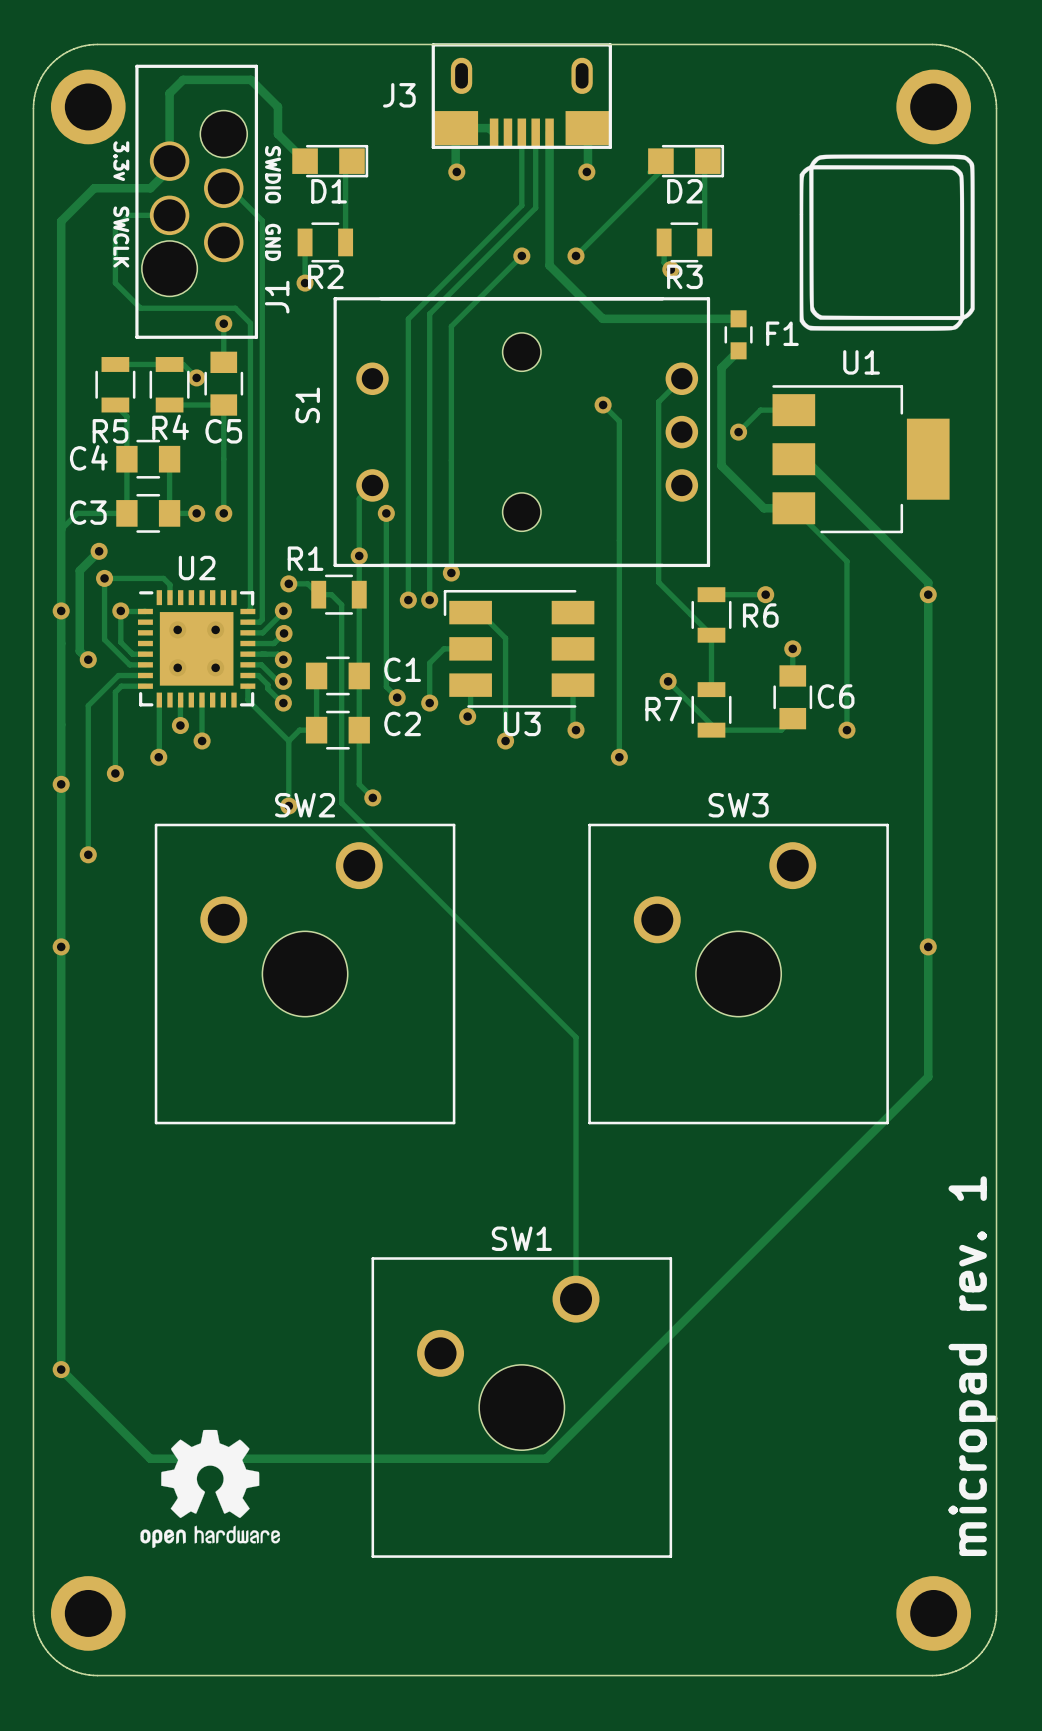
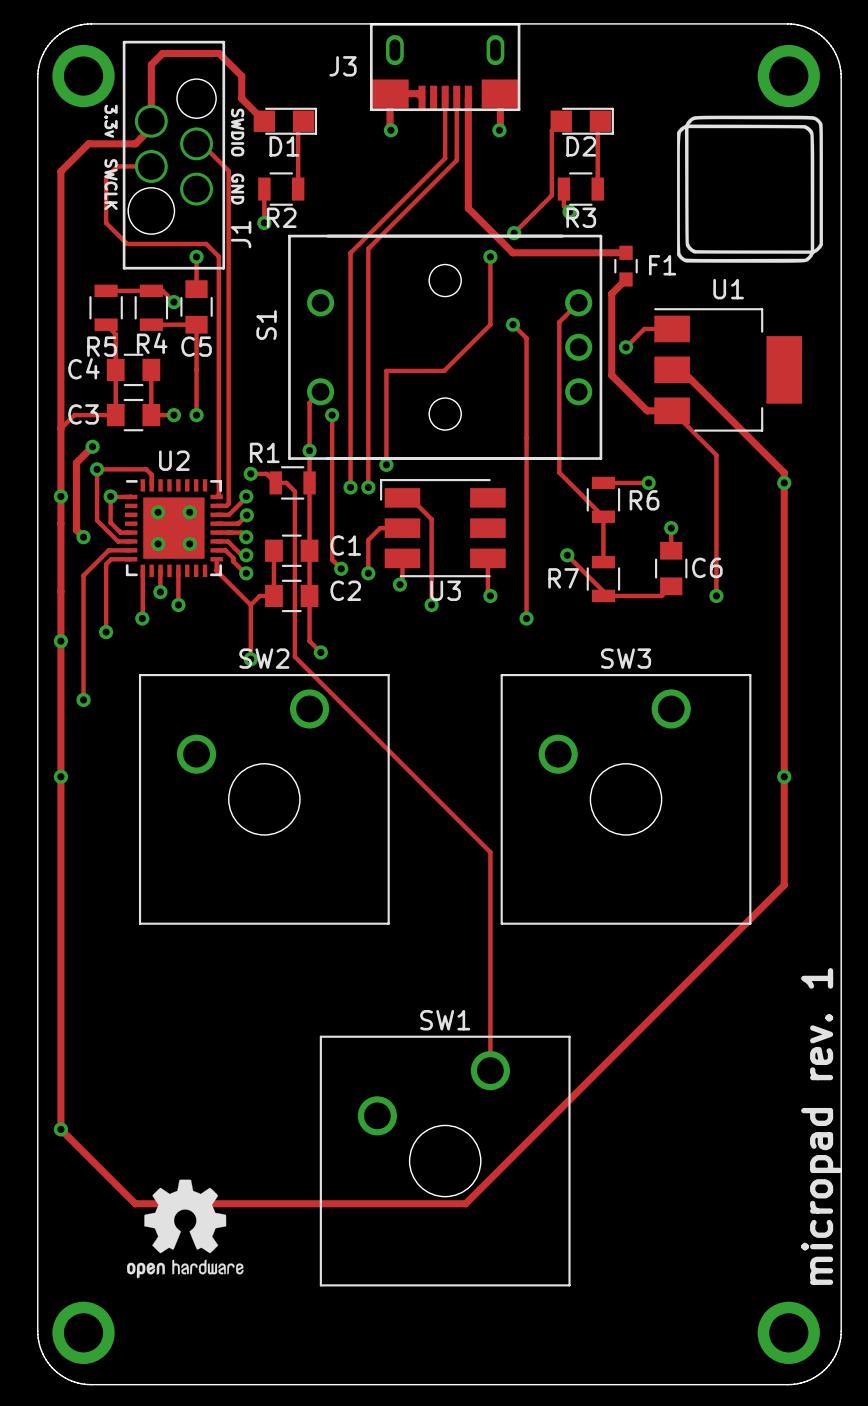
track: (660, 161) (660, 171) (576, 255) -> none
track: none -> (551, 130) (551, 195) (514, 233)
track: (521, 255) (451, 326) (451, 460) -> (490, 256) (490, 324) (444, 370) (386, 370)
via: (521, 255) -> none
via: (576, 255) -> none
via: none -> (514, 233)
via: none -> (490, 256)

